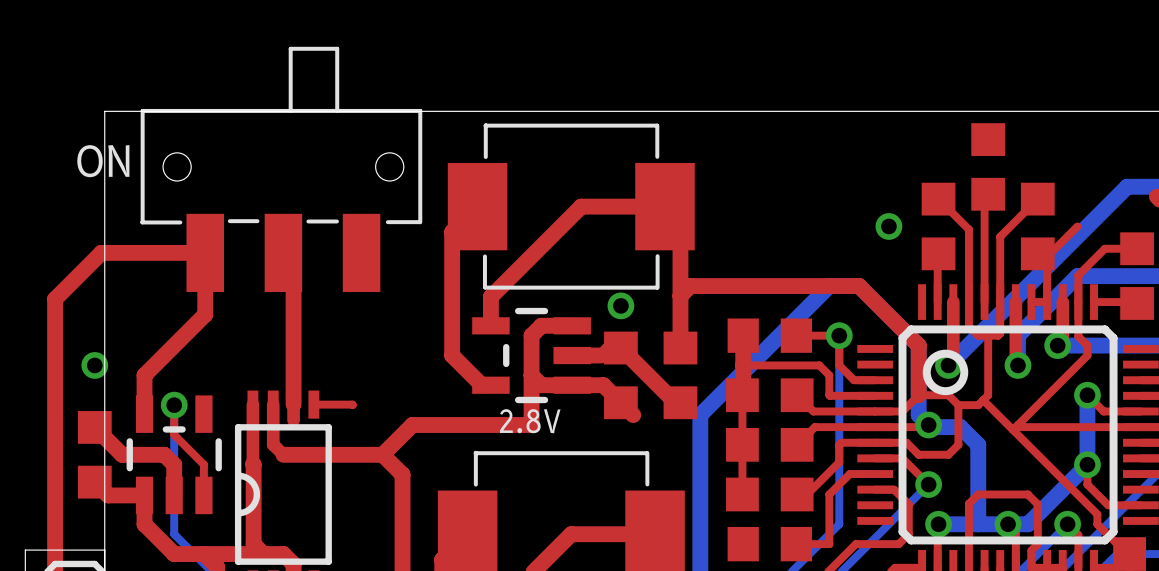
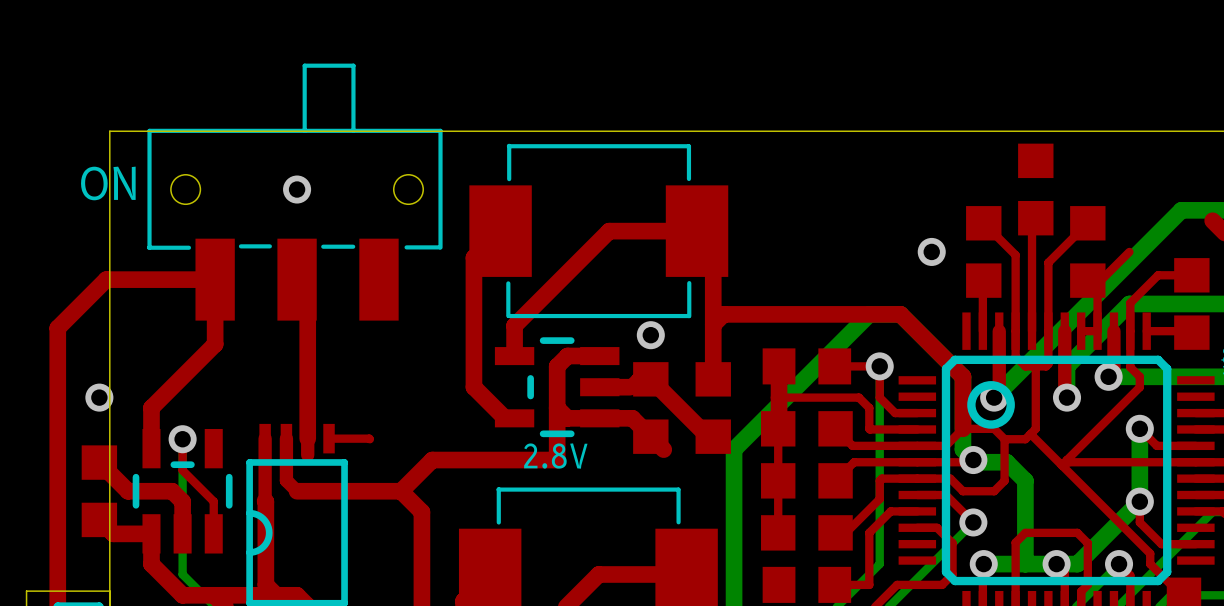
via: none -> (297, 189)

